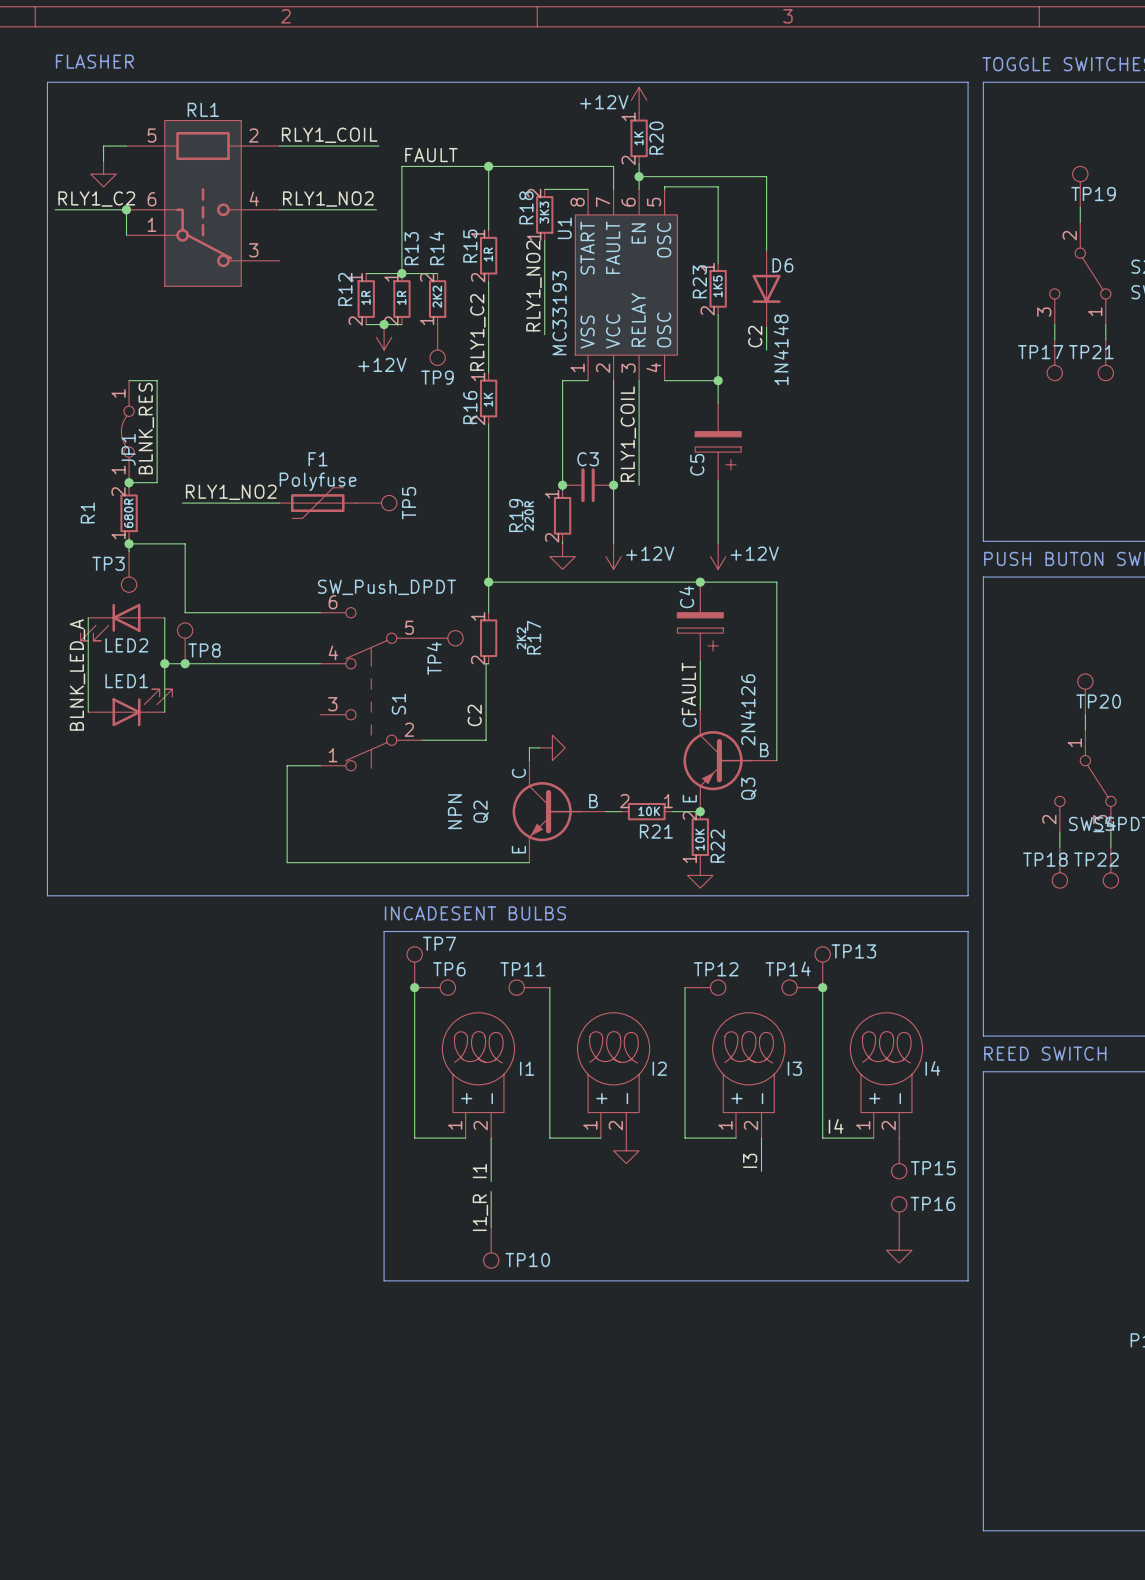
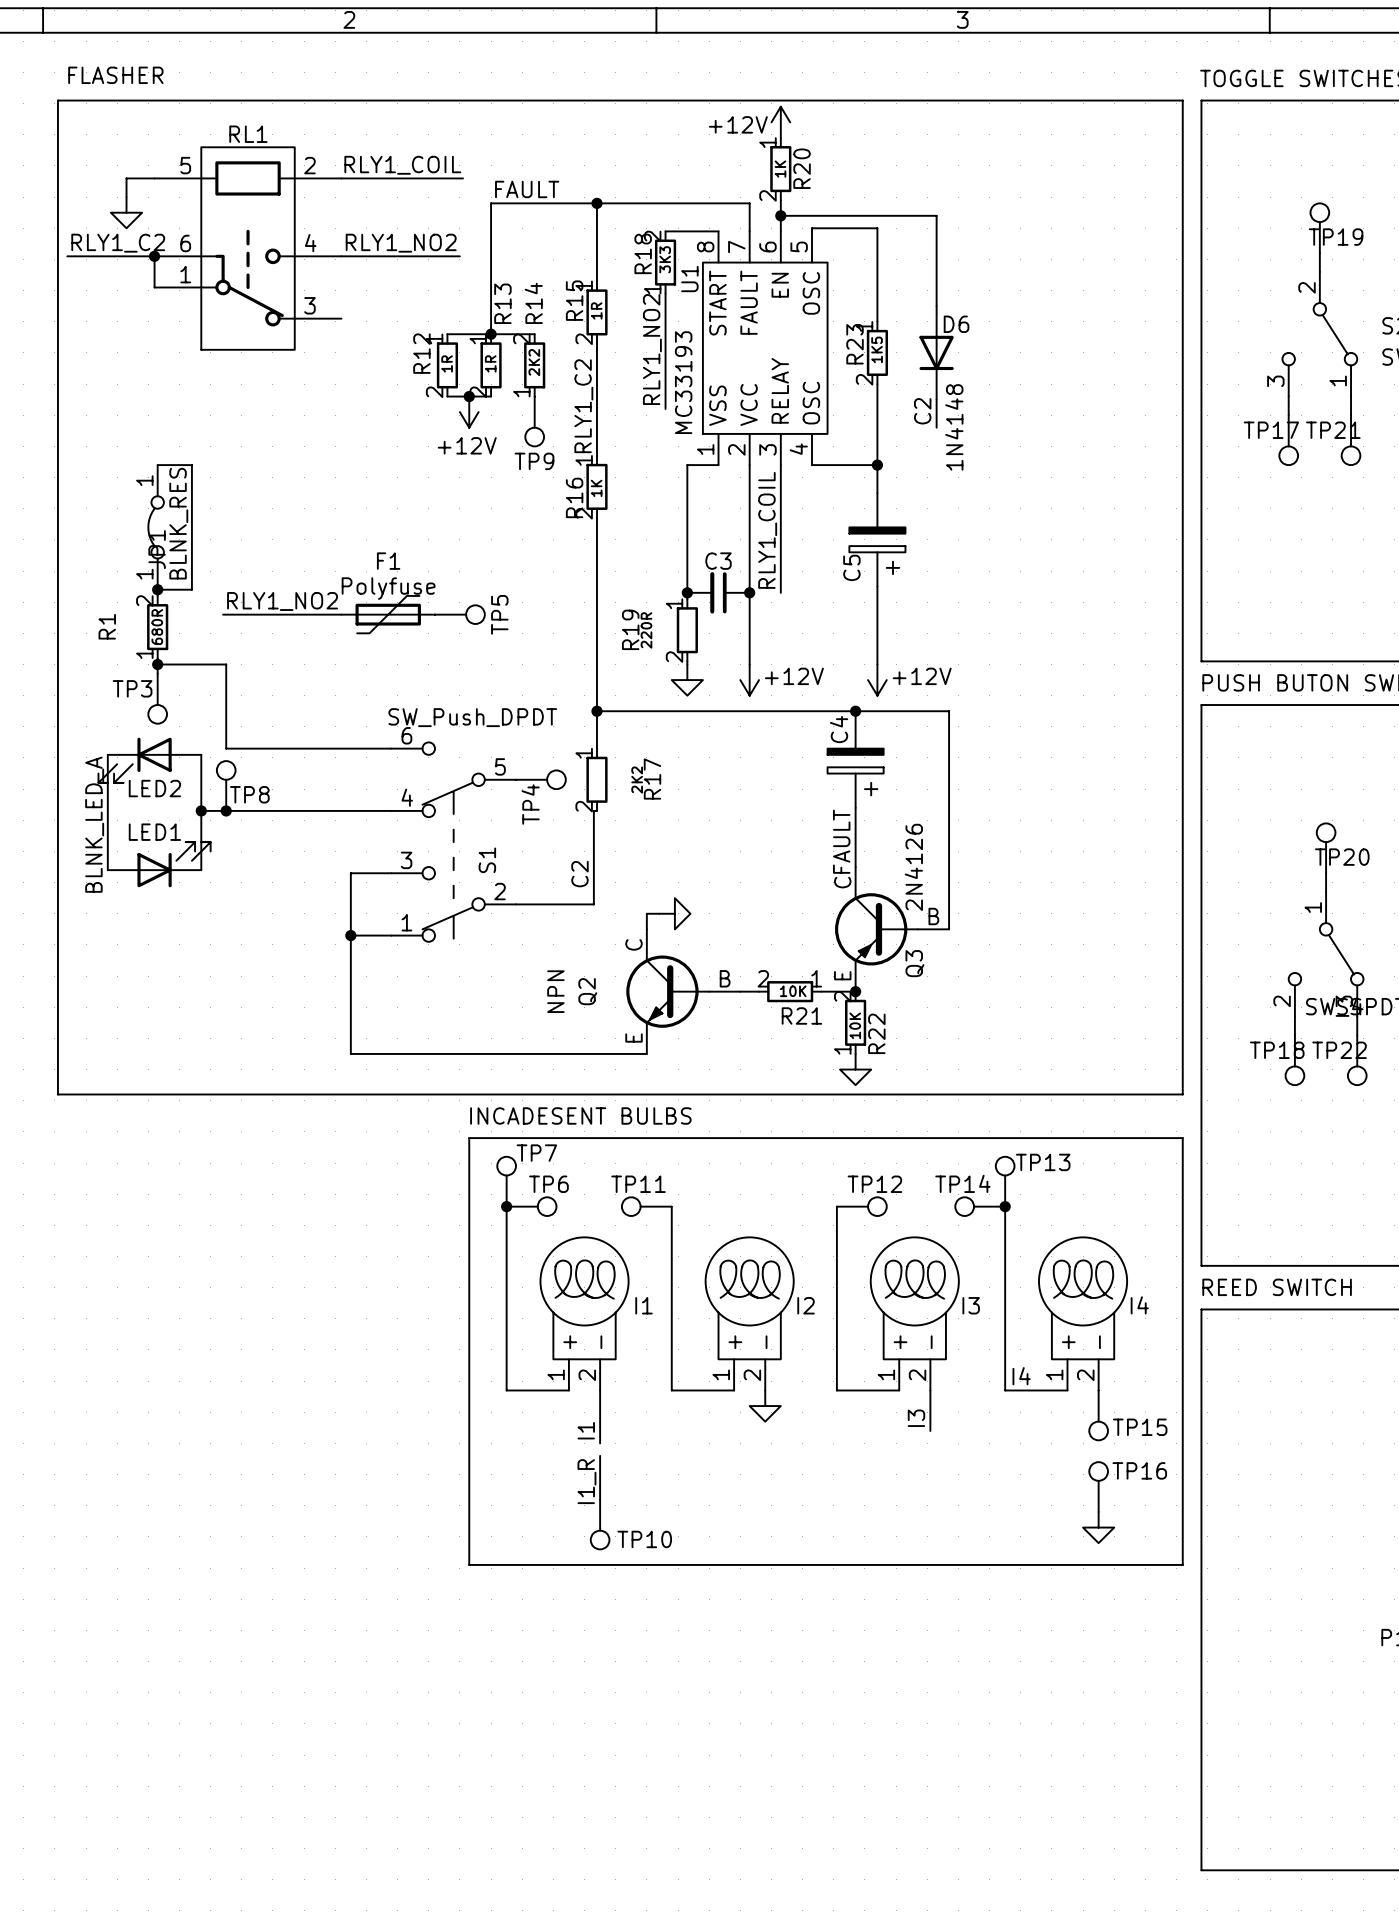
wire: none -> (391, 873) (350, 873) (350, 935)
junction: none -> (350, 935)

